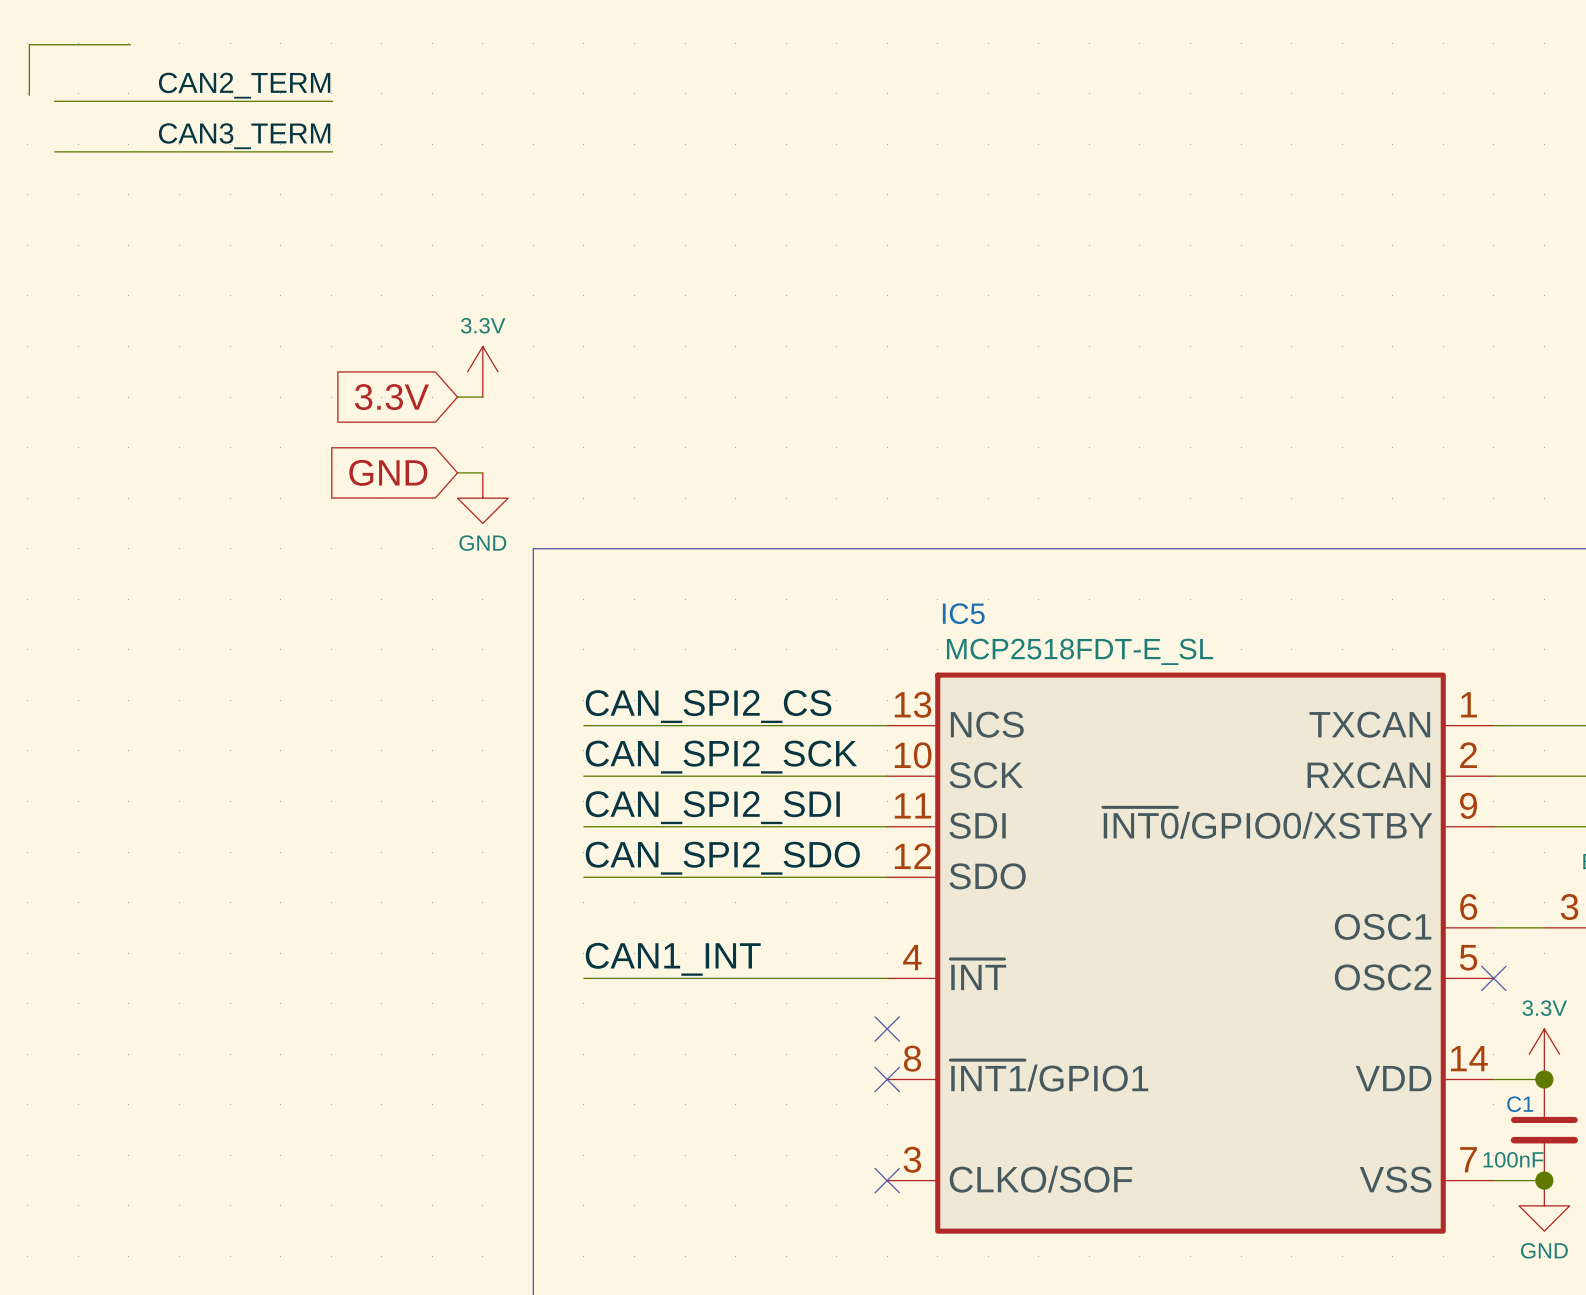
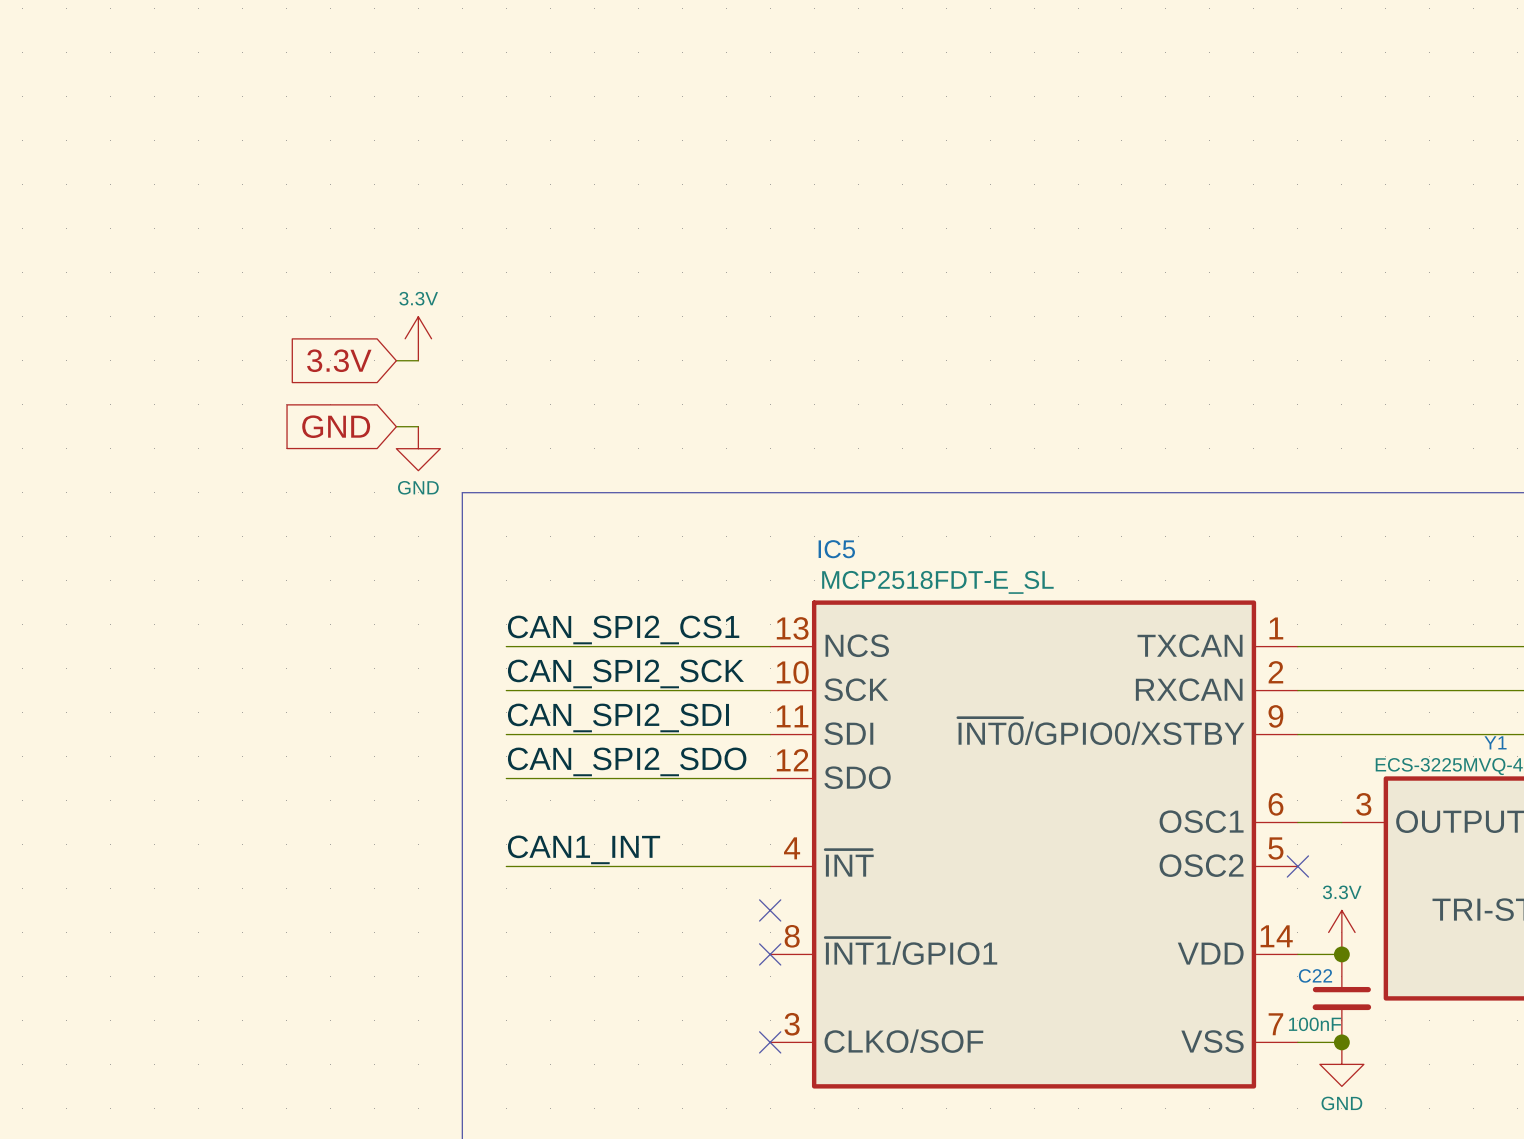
wire: (130, 44) (29, 44) (29, 95) -> none
label: CAN2_TERM (244, 85) -> none
wire: (54, 101) (332, 101) -> none
label: CAN3_TERM (244, 136) -> none
wire: (54, 151) (332, 151) -> none
label: CAN_SPI2_CS (708, 706) -> CAN_SPI2_CS1 (623, 629)
C1 name: C1 (1520, 1104) -> C22 (1315, 975)

